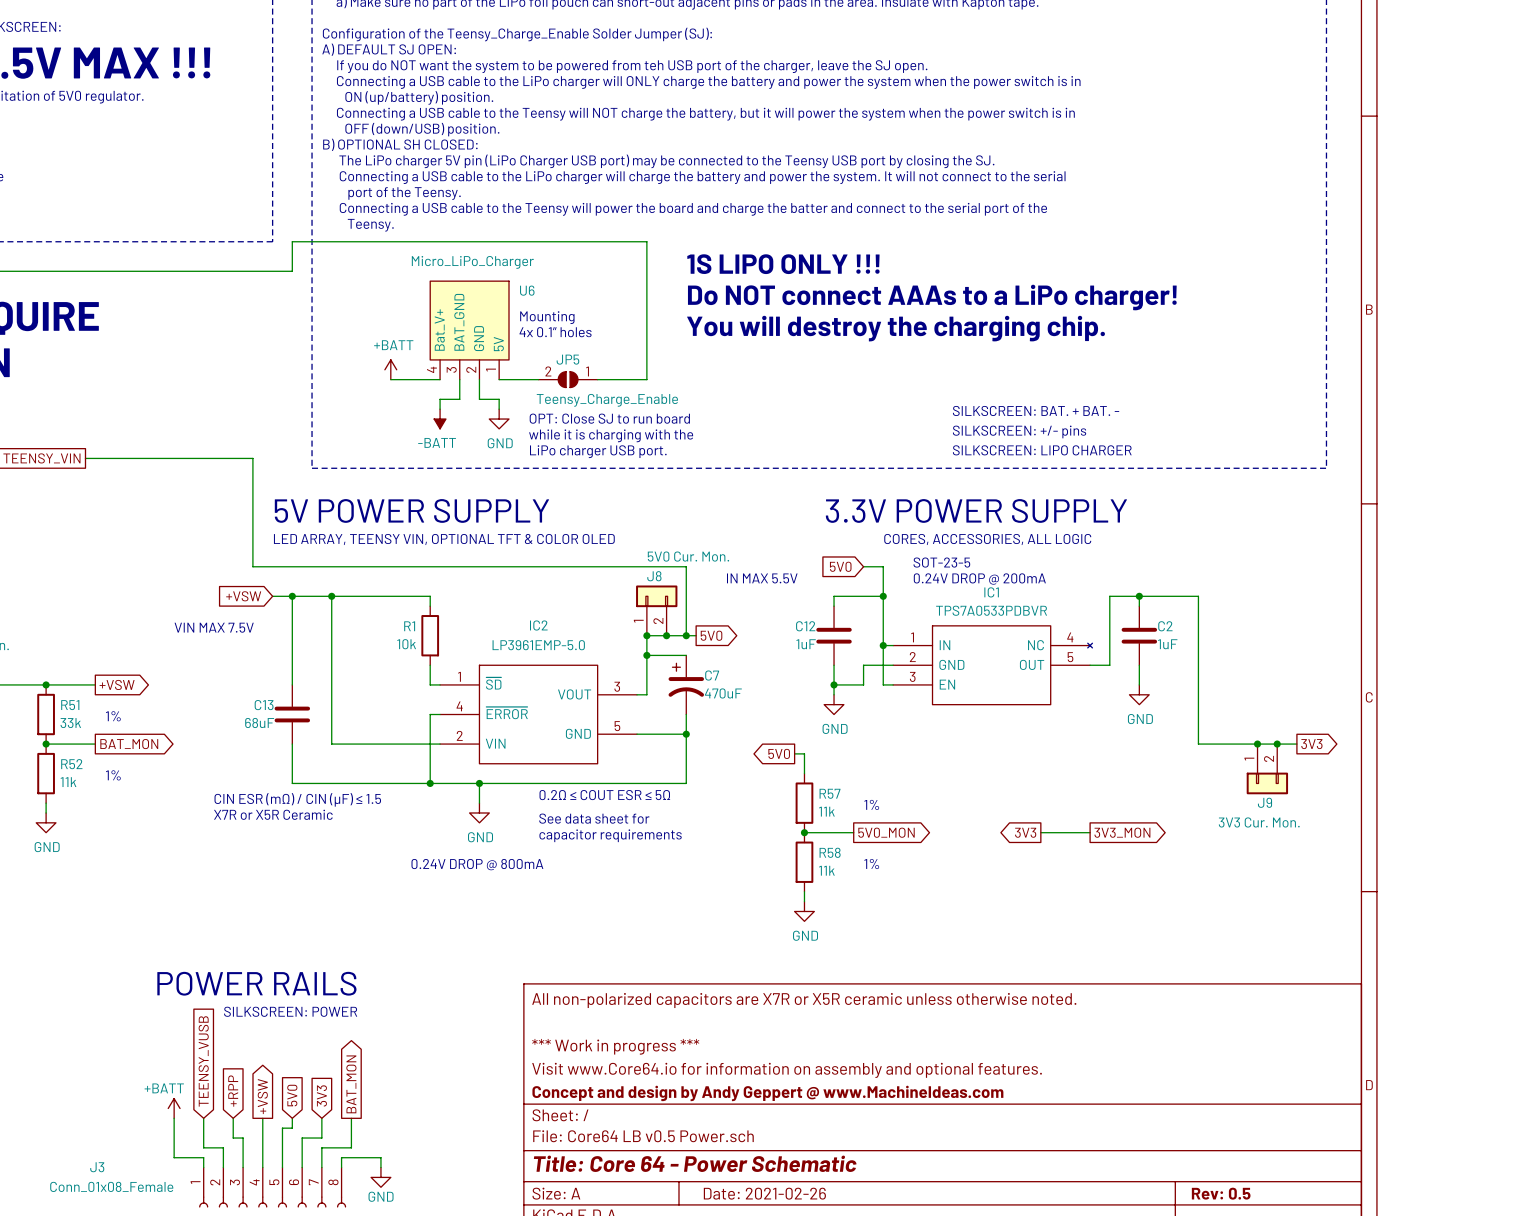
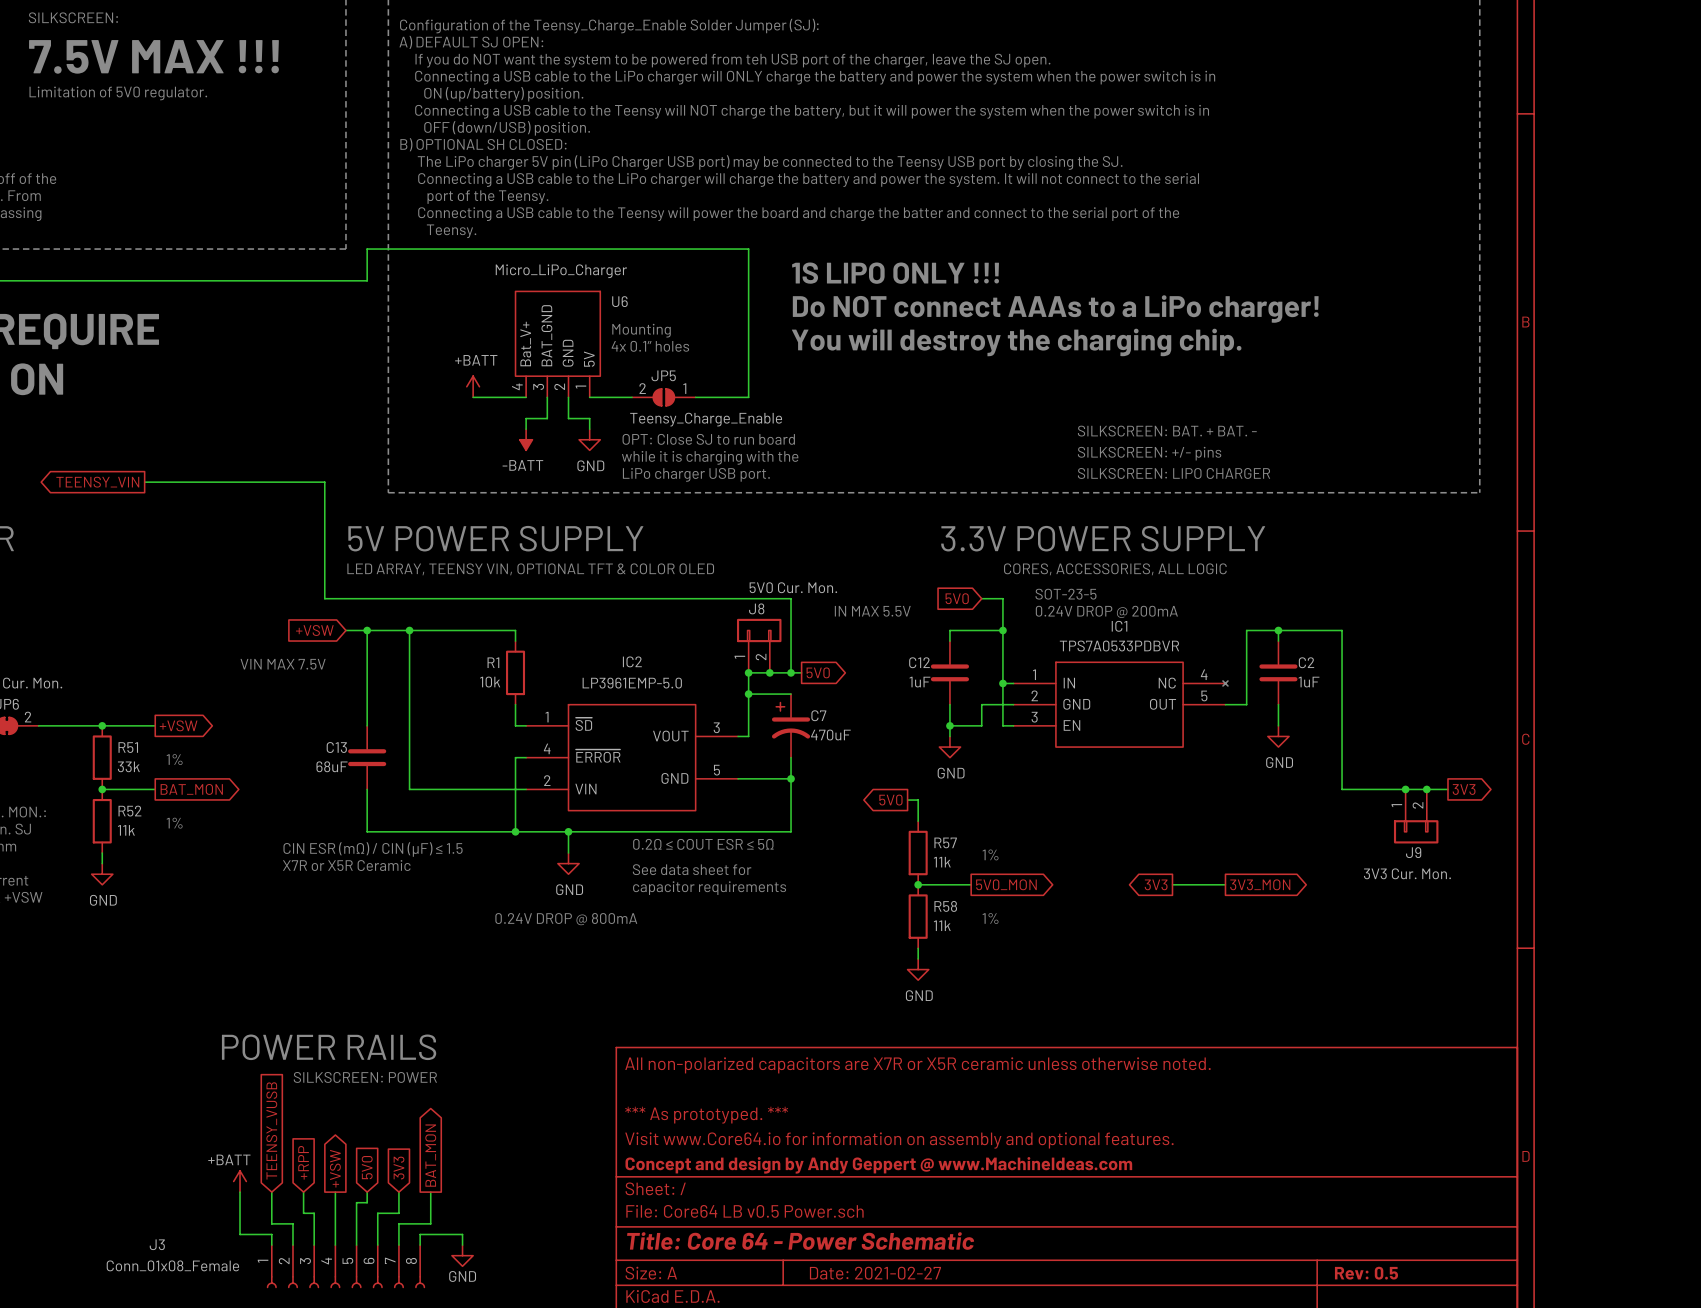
title block: *** Work in progress *** (615, 1046) -> *** As prototyped. *** (706, 1115)
title block: Date: 2021-02-26 (764, 1193) -> Date: 2021-02-27 (875, 1273)

